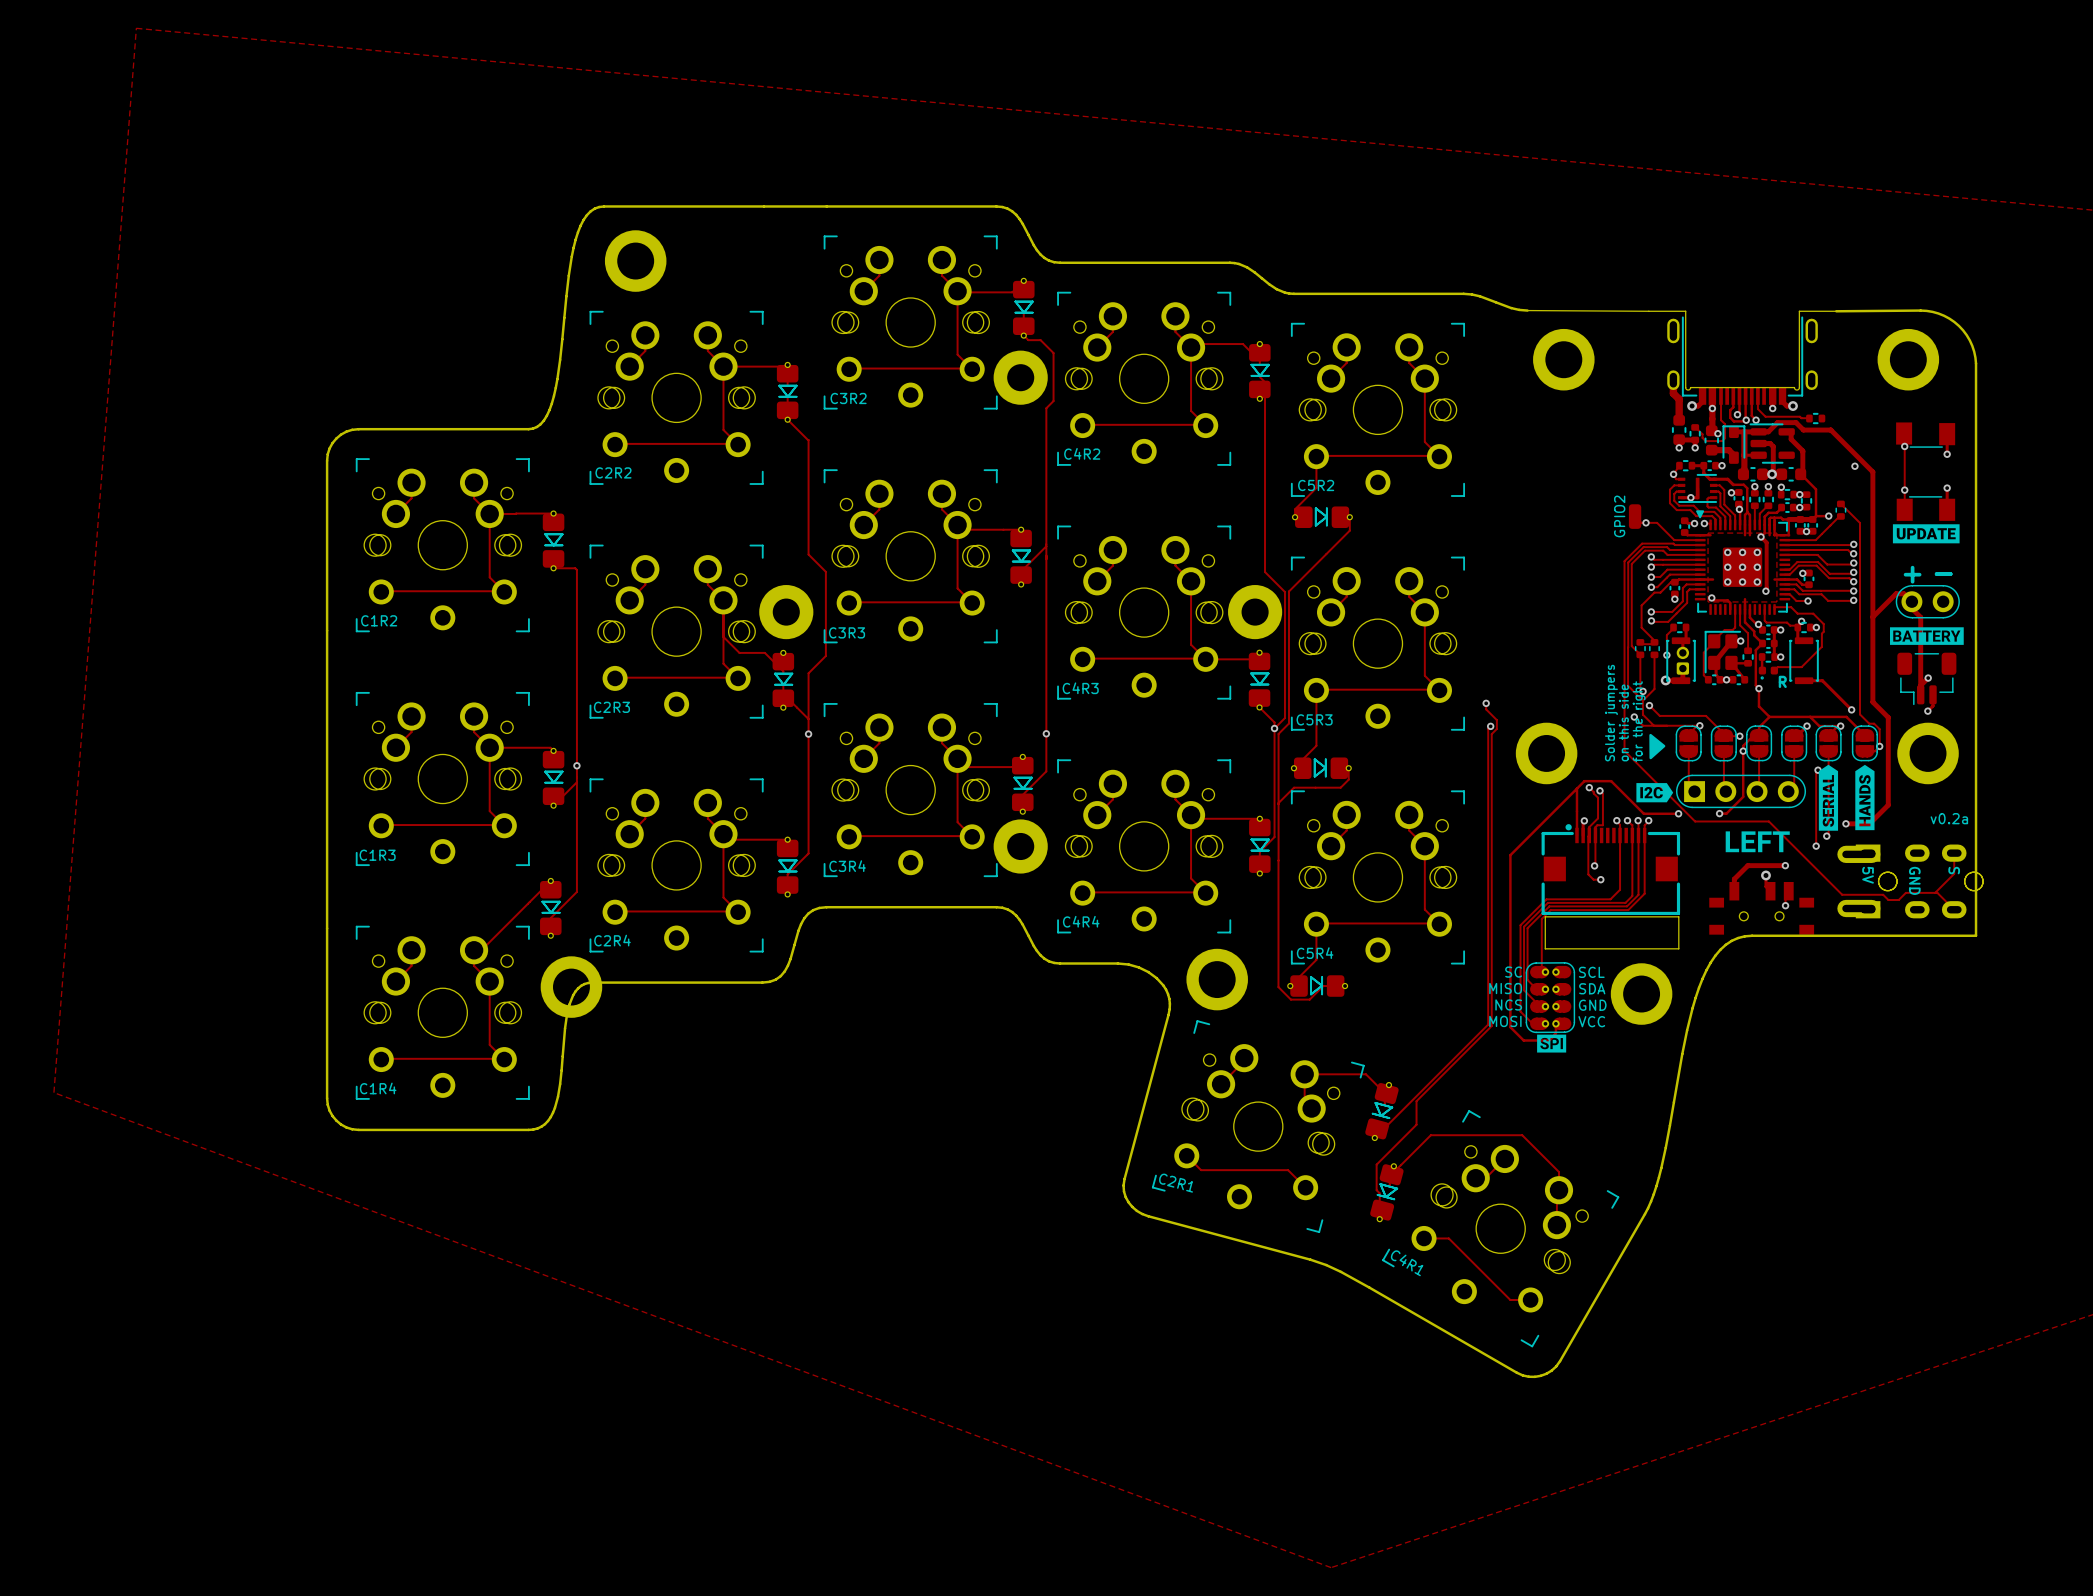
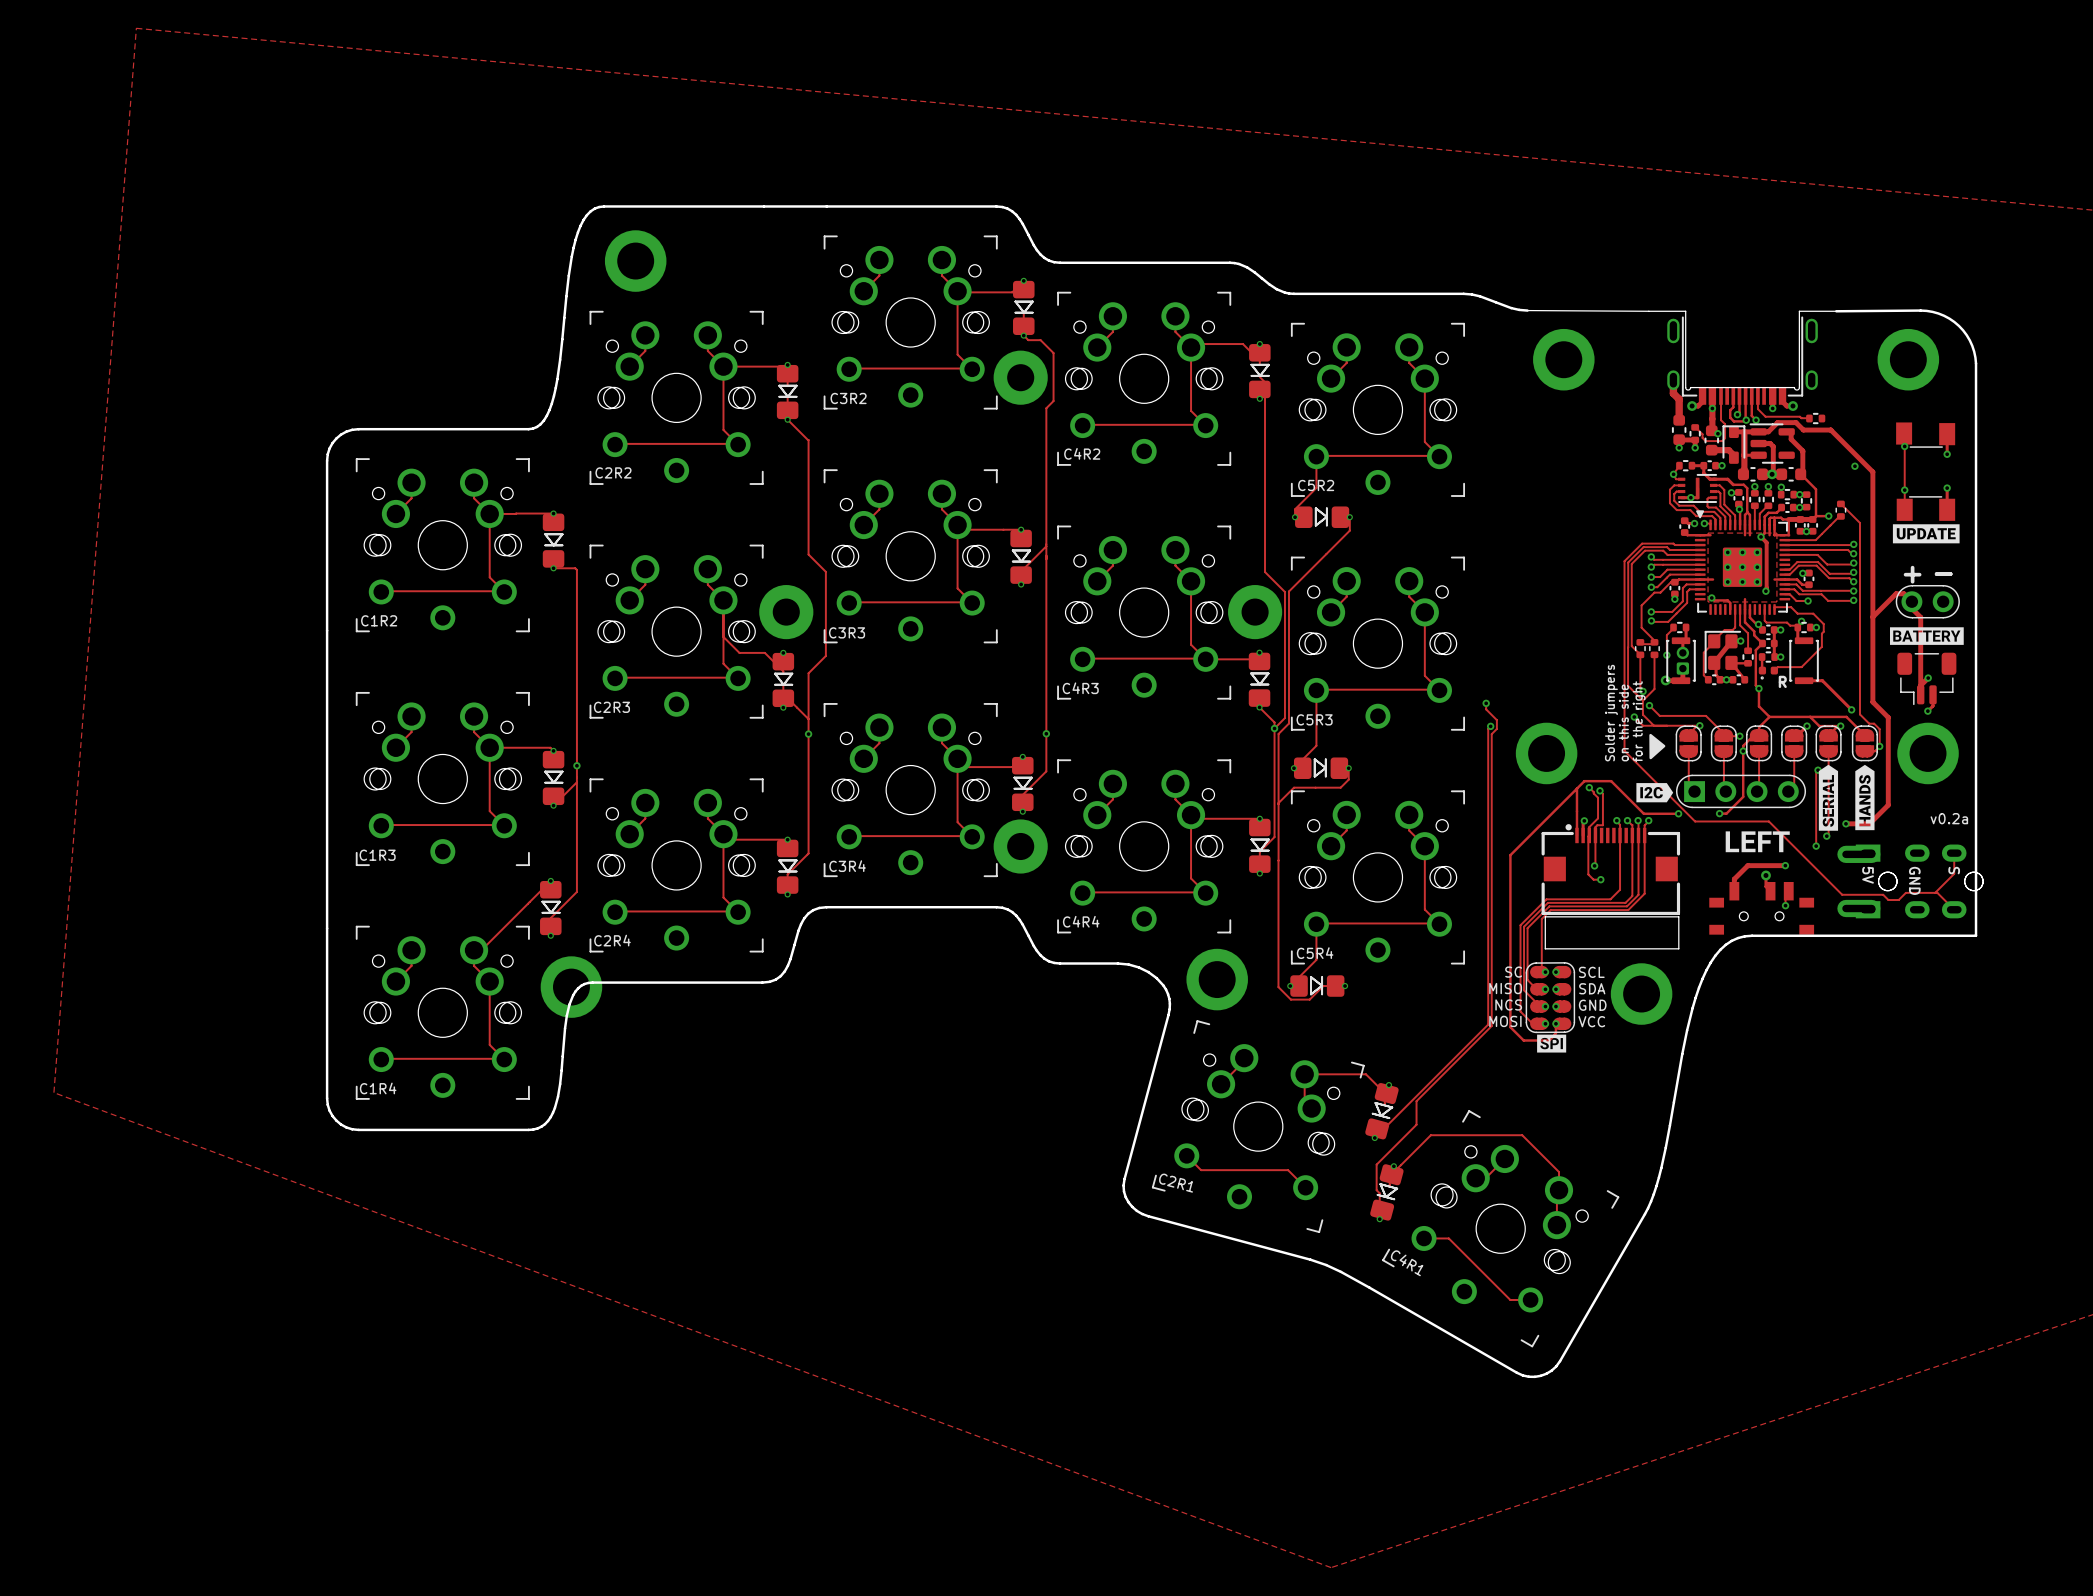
text: GPIO2 (1619, 516) -> none
track: (1635, 516) (1641, 522) (1657, 522) (1674, 540) (1700, 540) -> none
part: (1635, 516) -> none
via: (1646, 522) -> none

